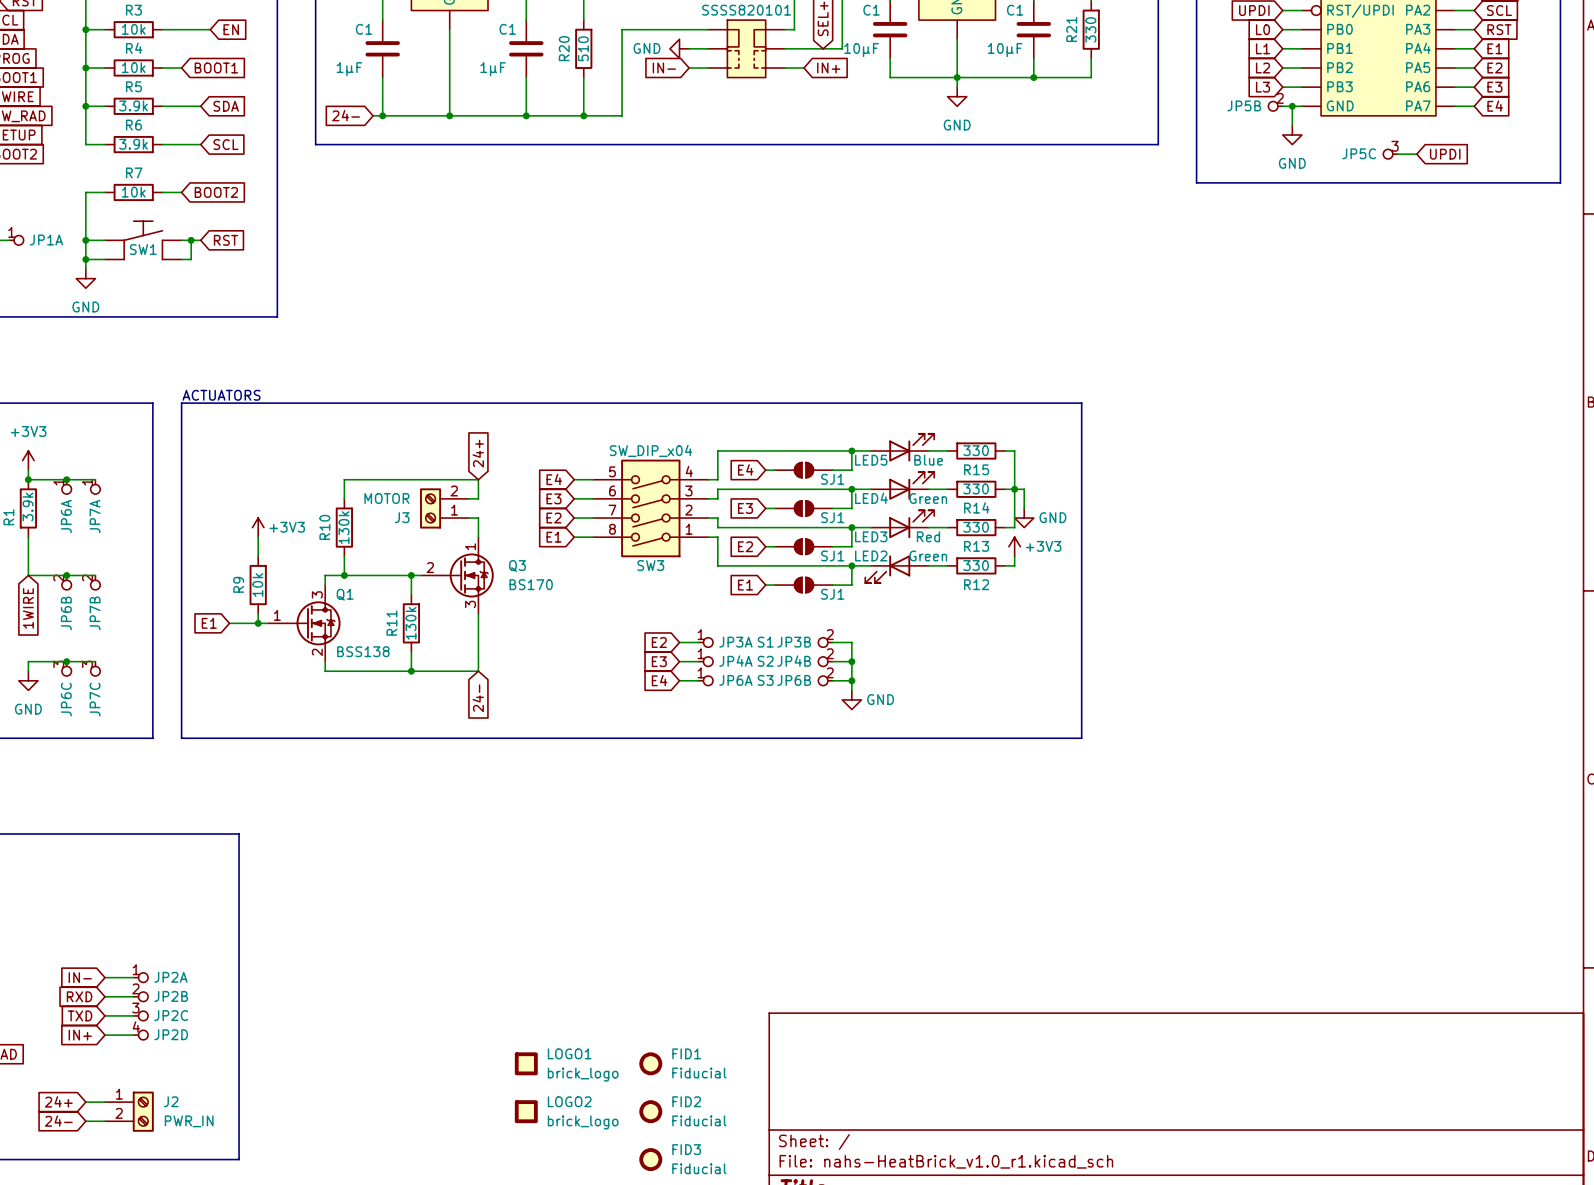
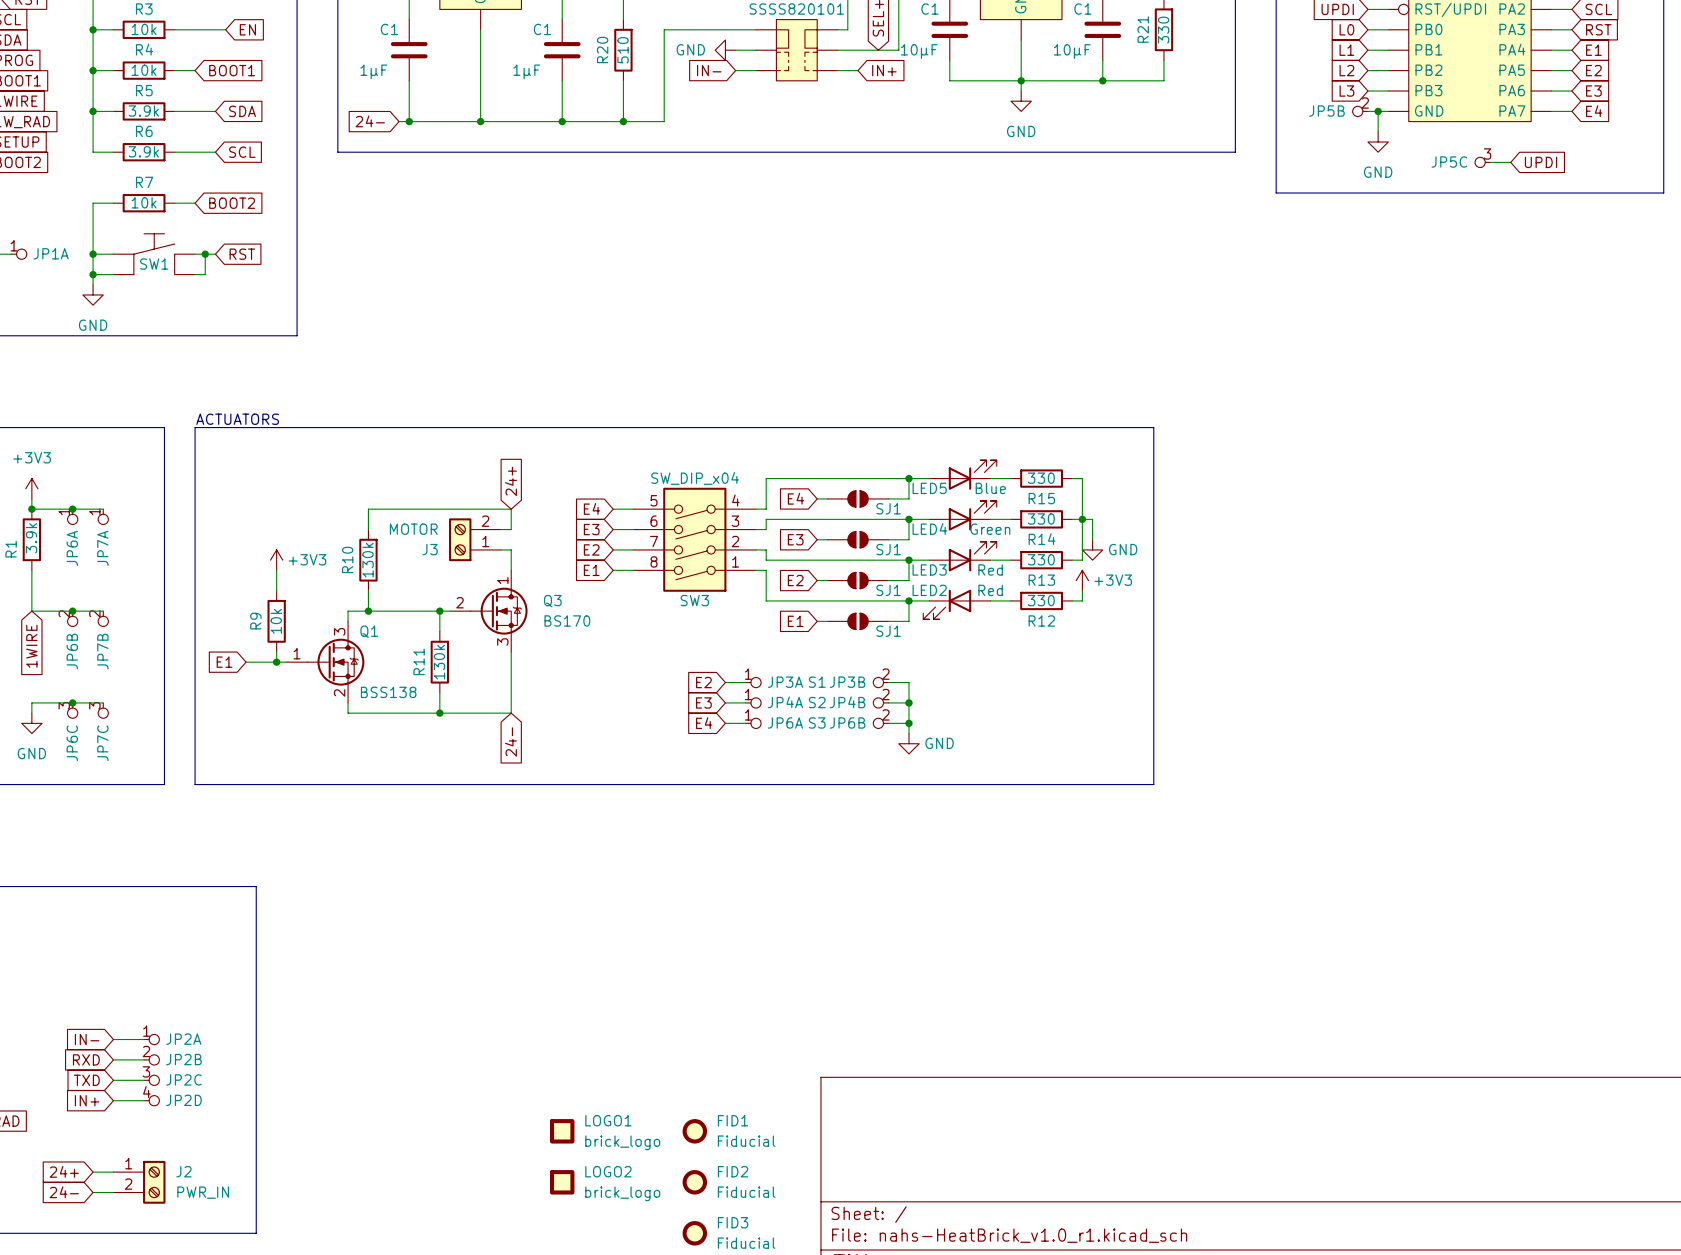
LED2 value: Green (928, 555) -> Red (990, 590)

